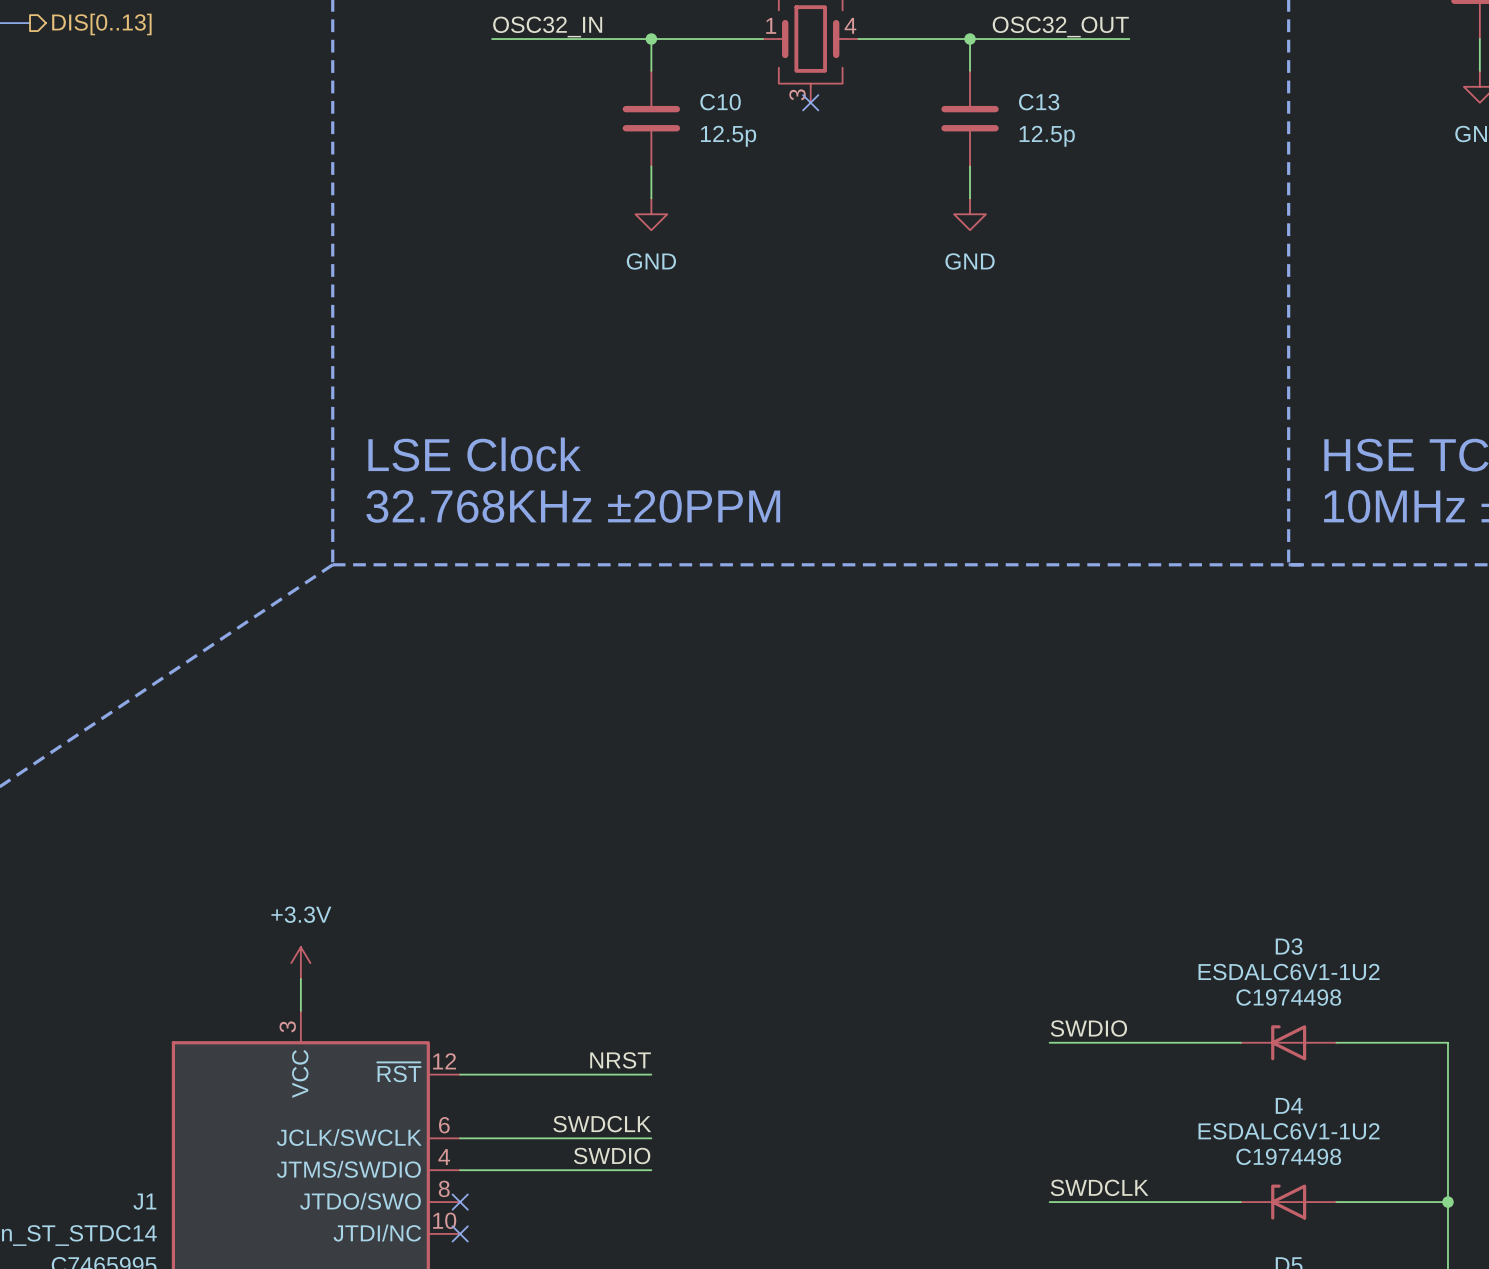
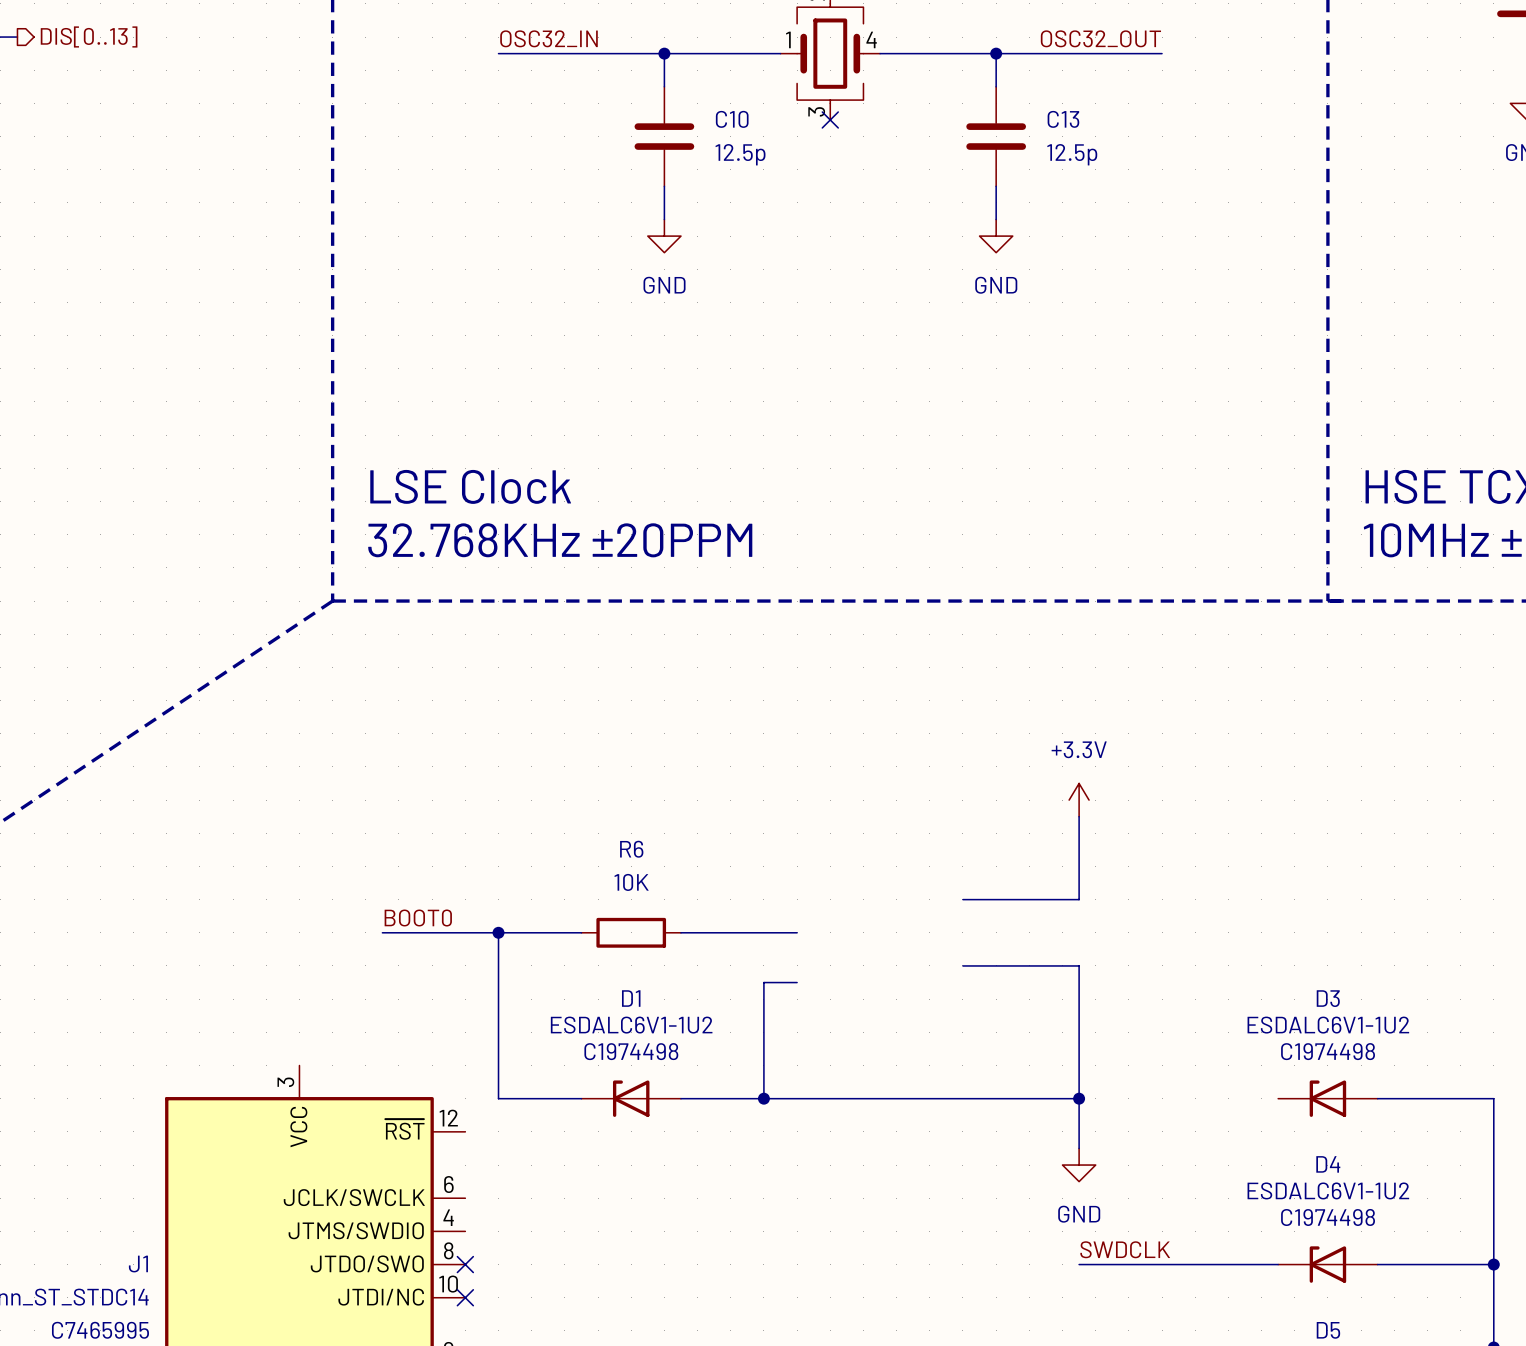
power symbol: none -> +3.3V (1079, 800)
wire: none -> (1079, 816) (1079, 899) (962, 899)
label: none -> BOOT0 (418, 918)
wire: none -> (498, 932) (498, 1098) (581, 1098)
junction: none -> (498, 932)
R6: none -> 10K (631, 932)
wire: none -> (680, 932) (797, 932)
wire: none -> (962, 965) (1079, 965) (1079, 1148)
wire: none -> (797, 982) (763, 982) (763, 1098)
power symbol: +3.3V (300, 963) -> none
wire: (300, 979) (300, 1010) -> none
label: SWDIO (1088, 1028) -> none
D1: none -> ESDALC6V1-1U2 (631, 1098)
junction: none -> (763, 1098)
wire: (1049, 1042) (1240, 1042) -> (1079, 1098) (680, 1098)
junction: none -> (1079, 1098)
label: NRST (620, 1060) -> none
wire: (460, 1074) (651, 1074) -> (382, 932) (581, 932)
power symbol: none -> GND (1079, 1165)
label: SWDCLK (602, 1124) -> none
wire: (460, 1138) (651, 1138) -> none
label: SWDIO (612, 1155) -> none
wire: (460, 1170) (651, 1170) -> none

